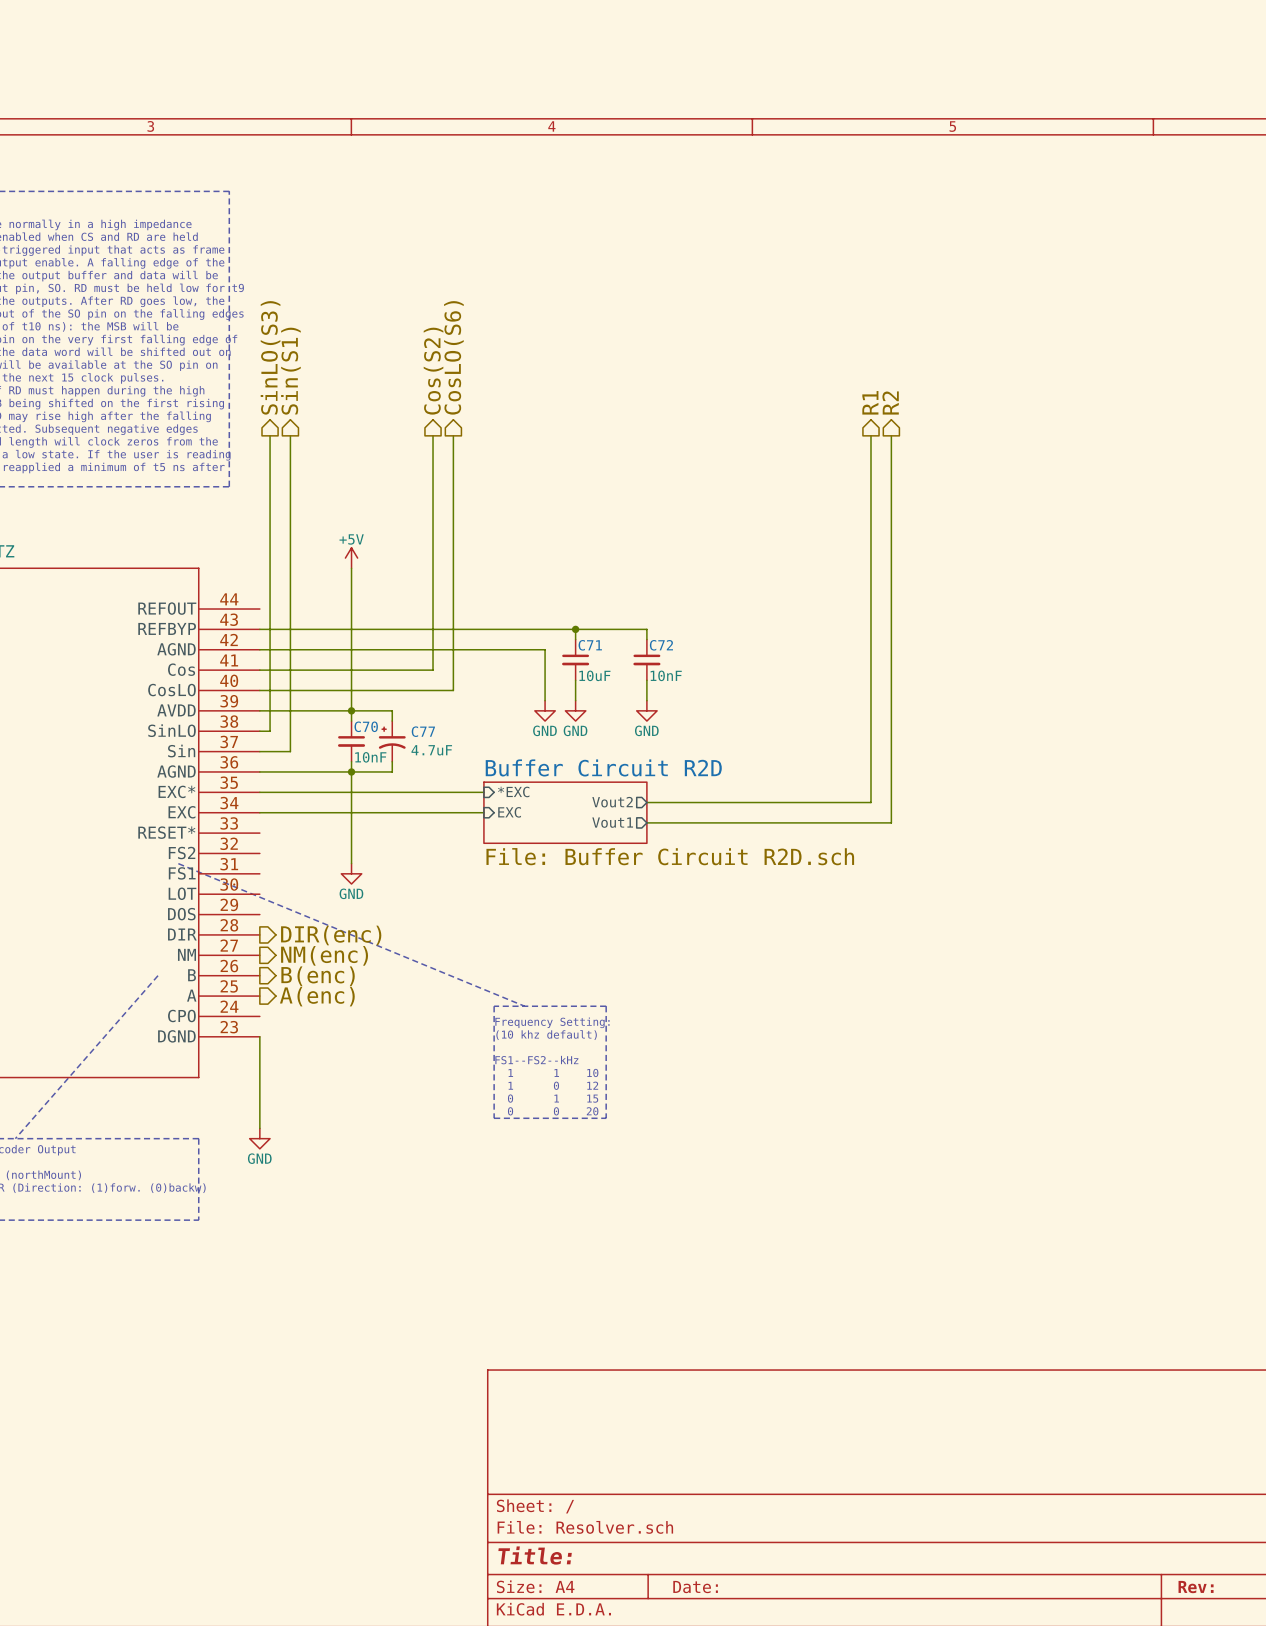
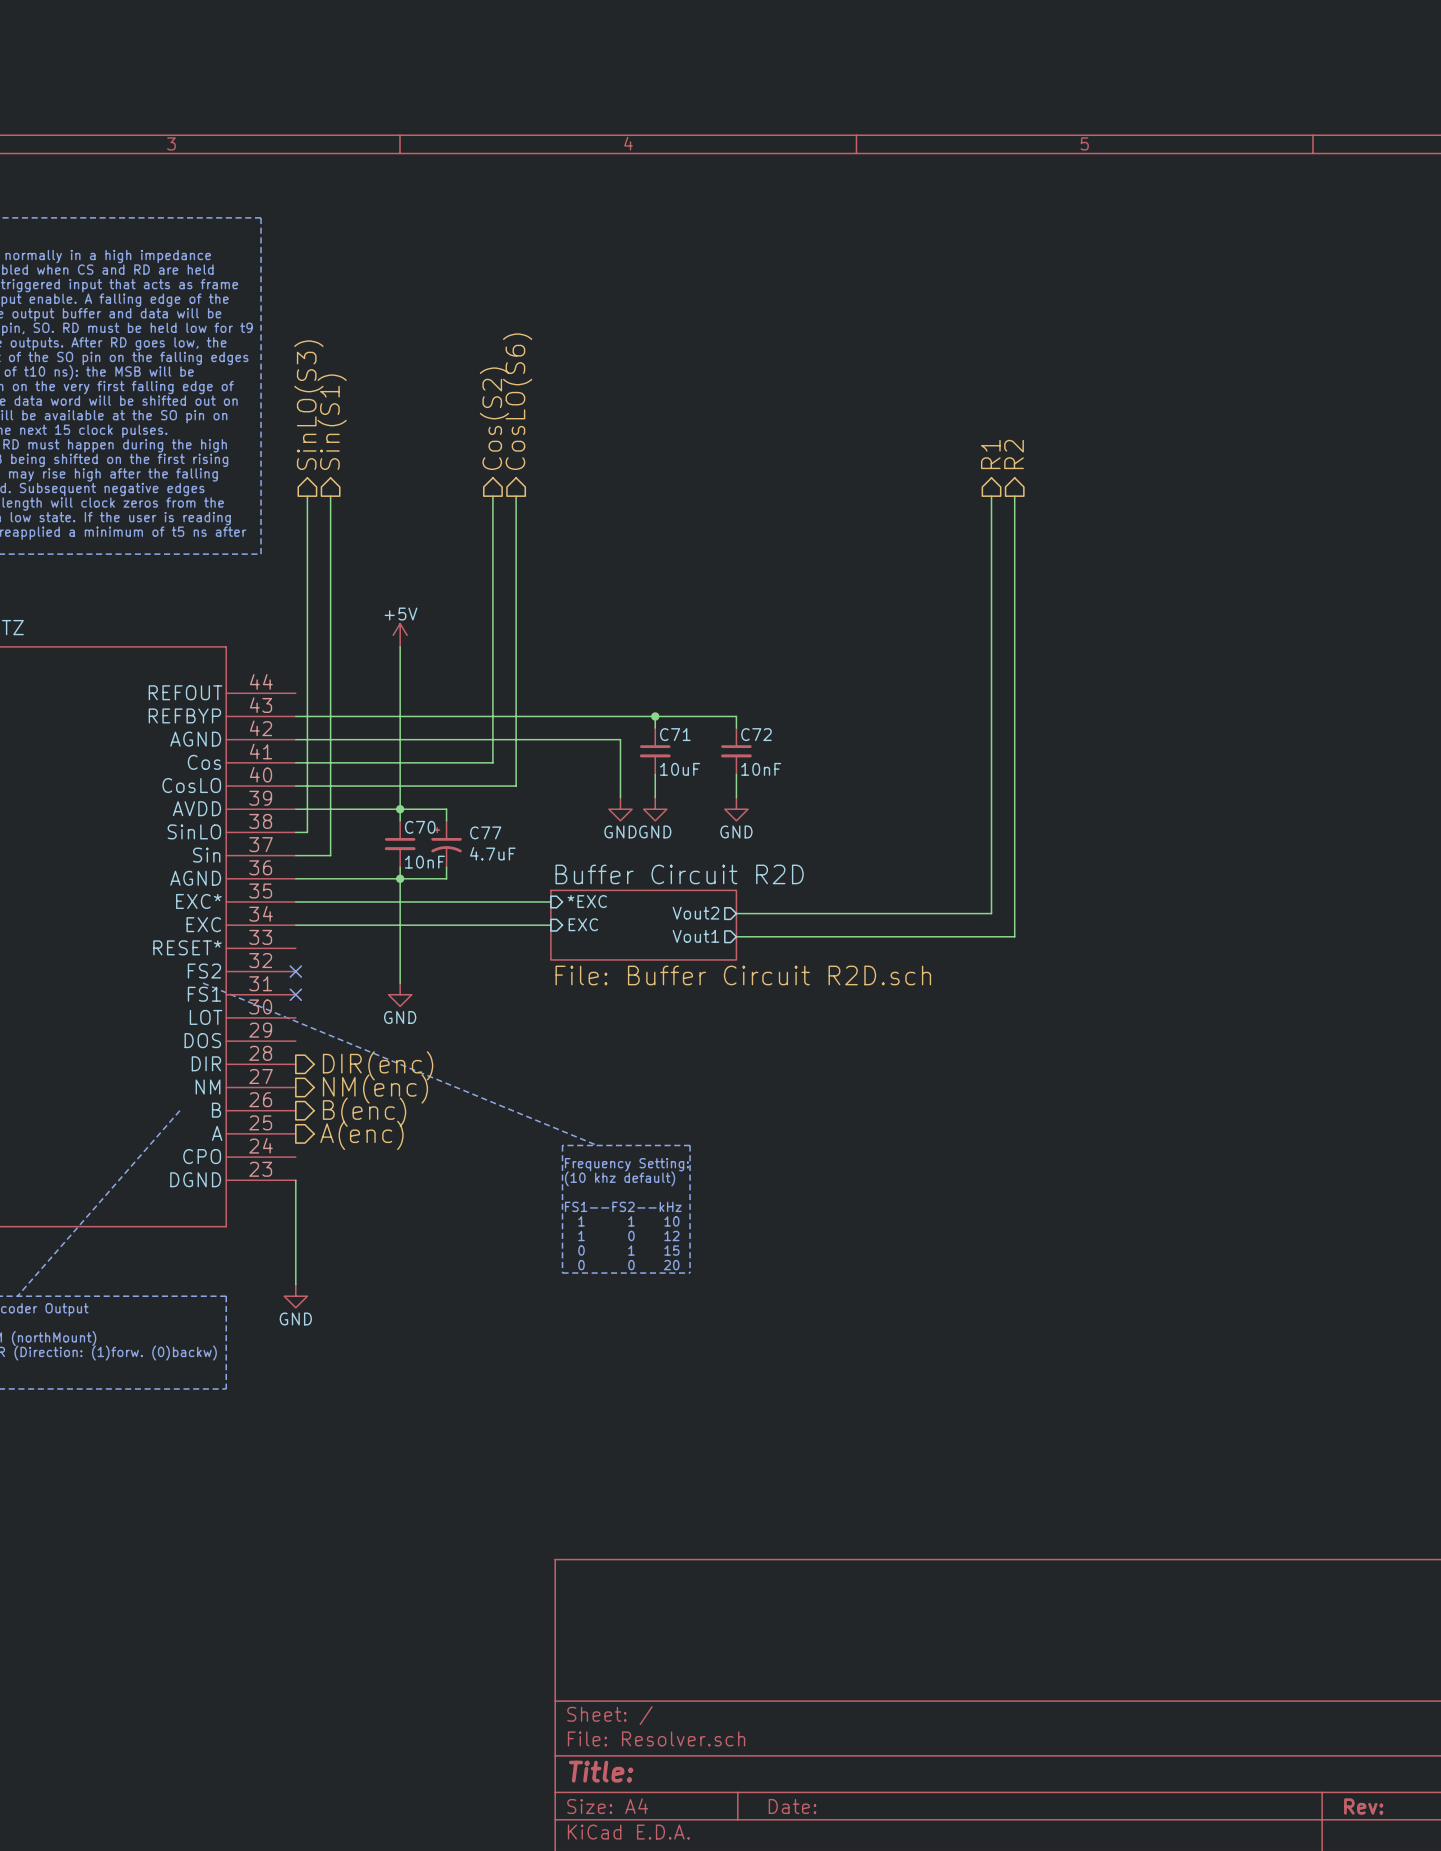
no-connect mark: none -> (295, 971)
no-connect mark: none -> (295, 994)

